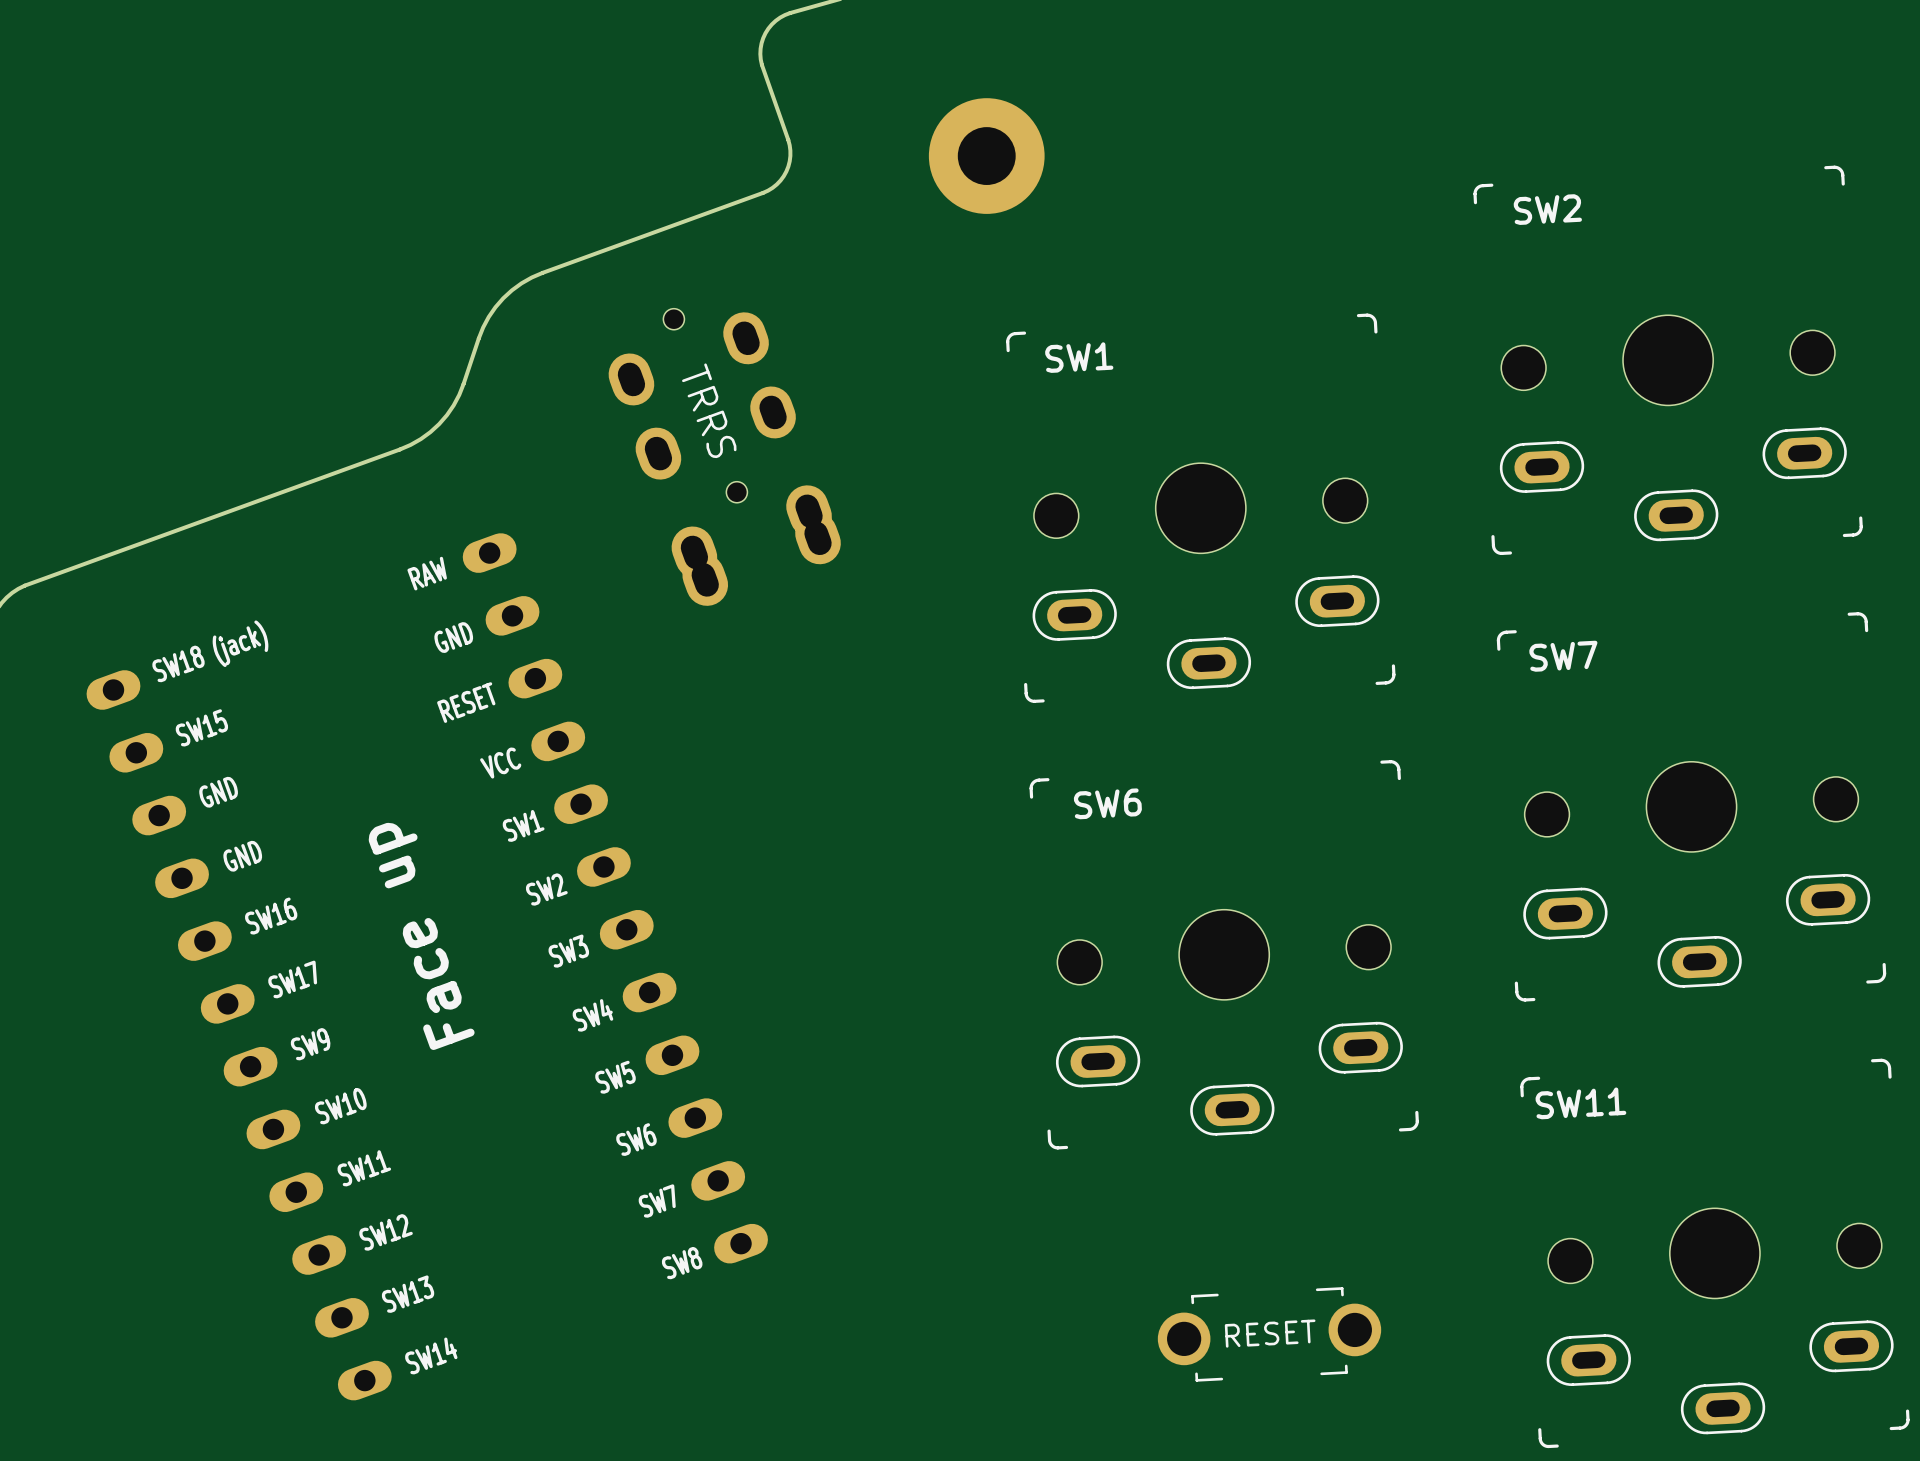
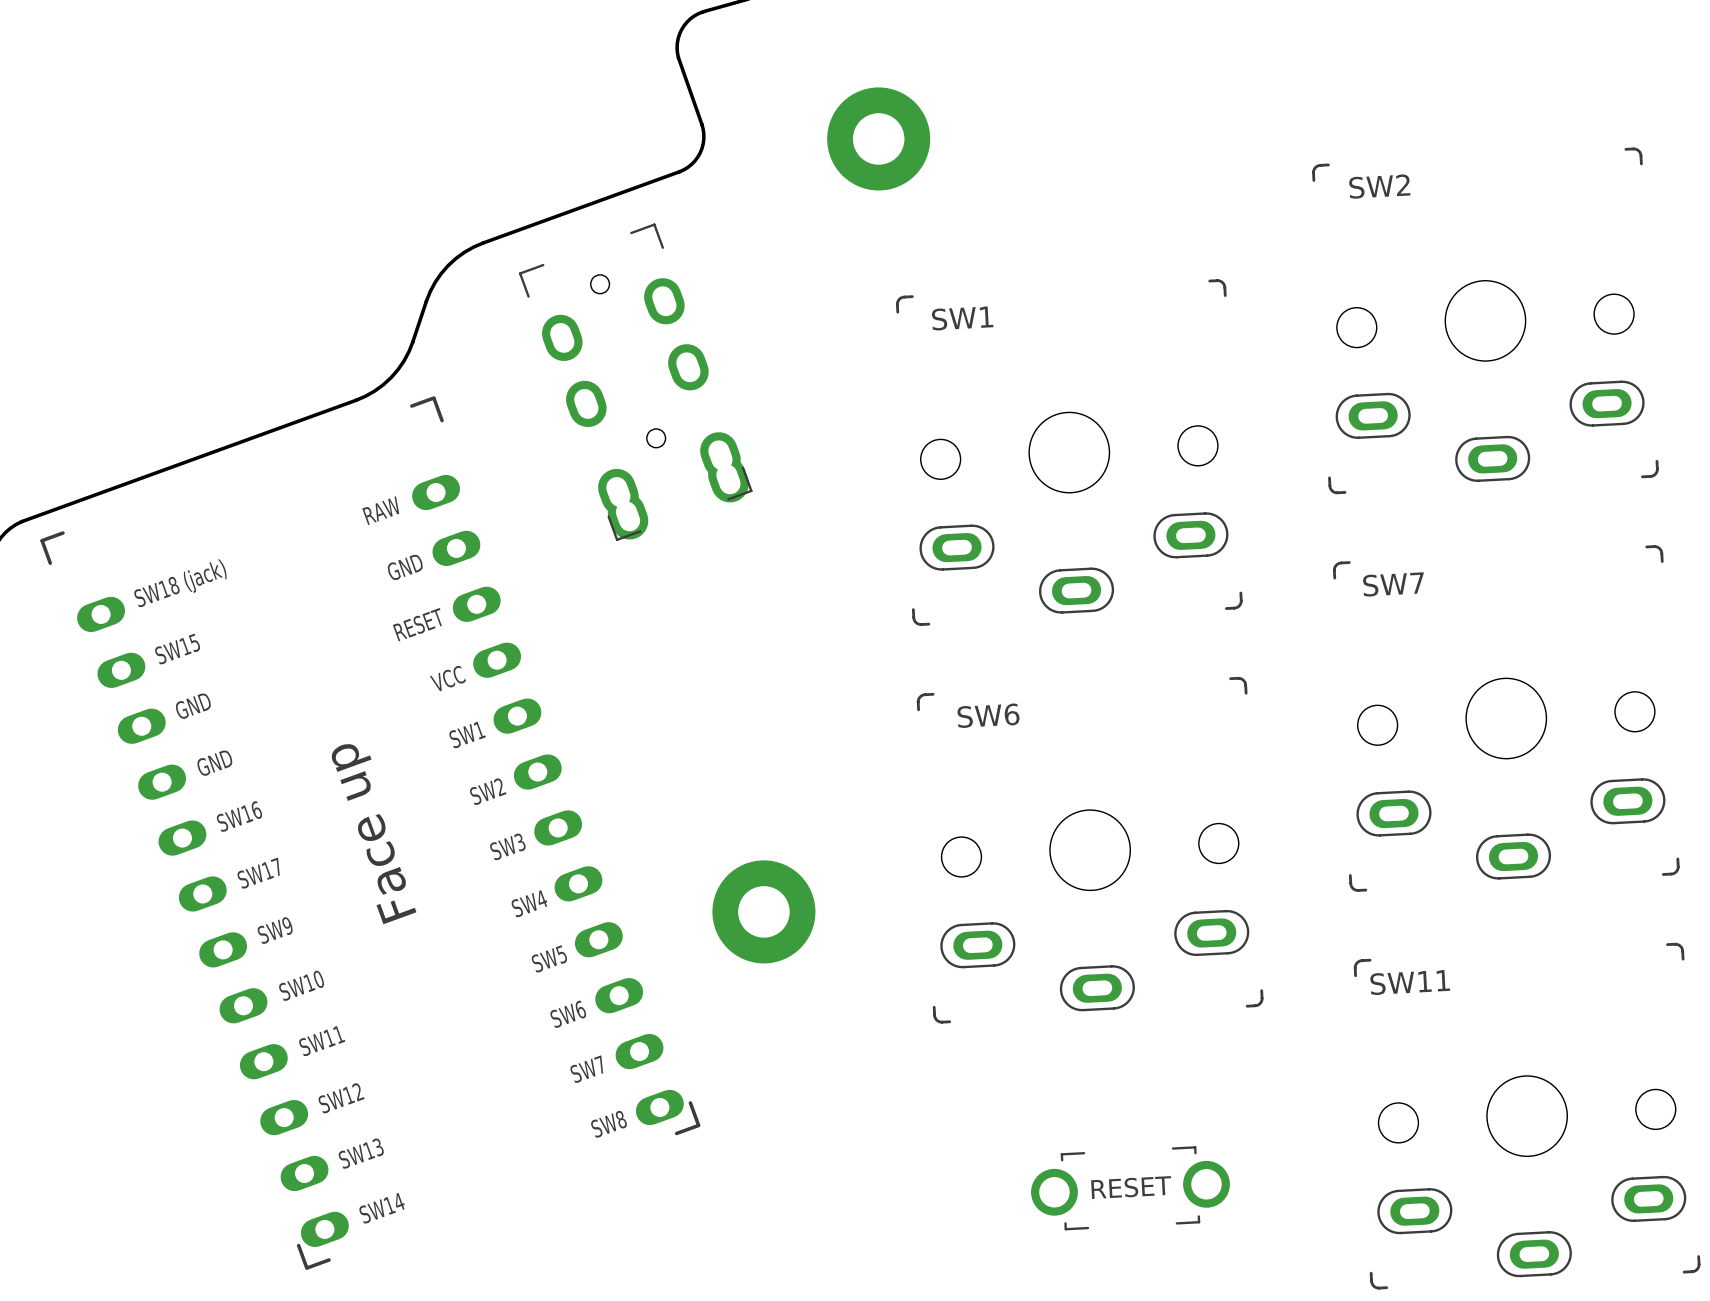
part: none -> (635, 382)
part: (724, 457) -> none
part: none -> (370, 833)
part: none -> (763, 911)

